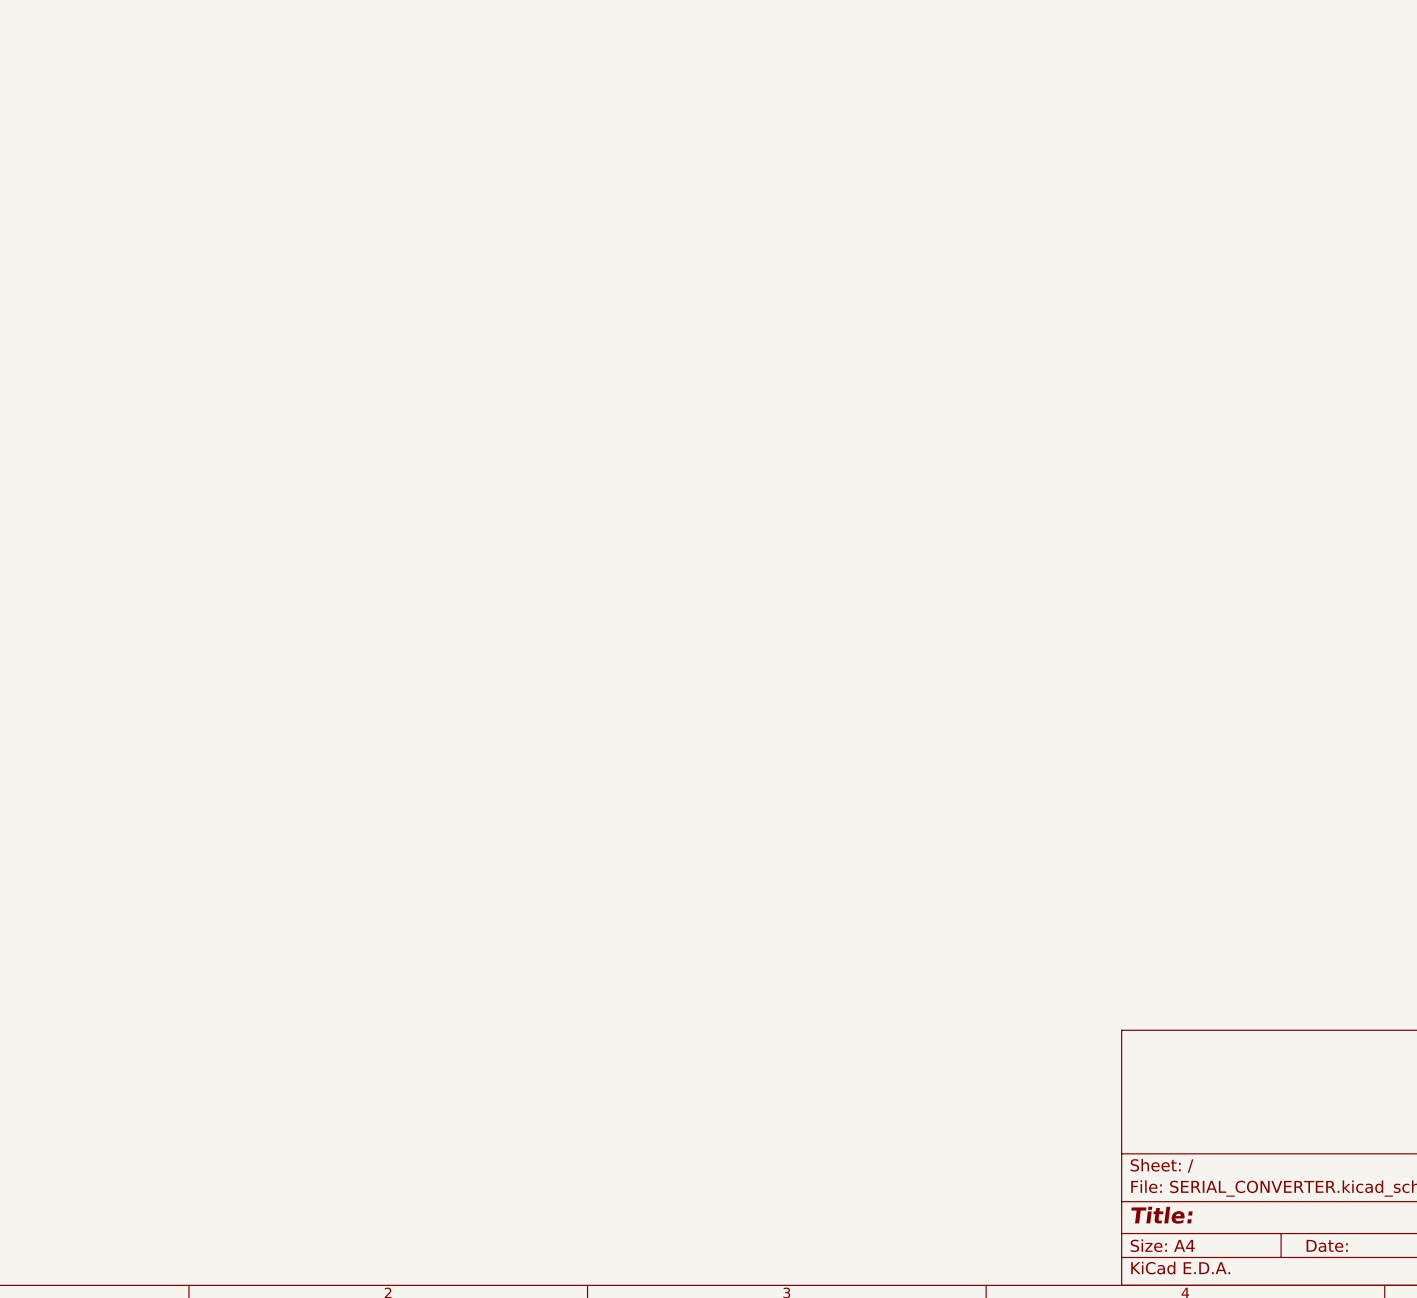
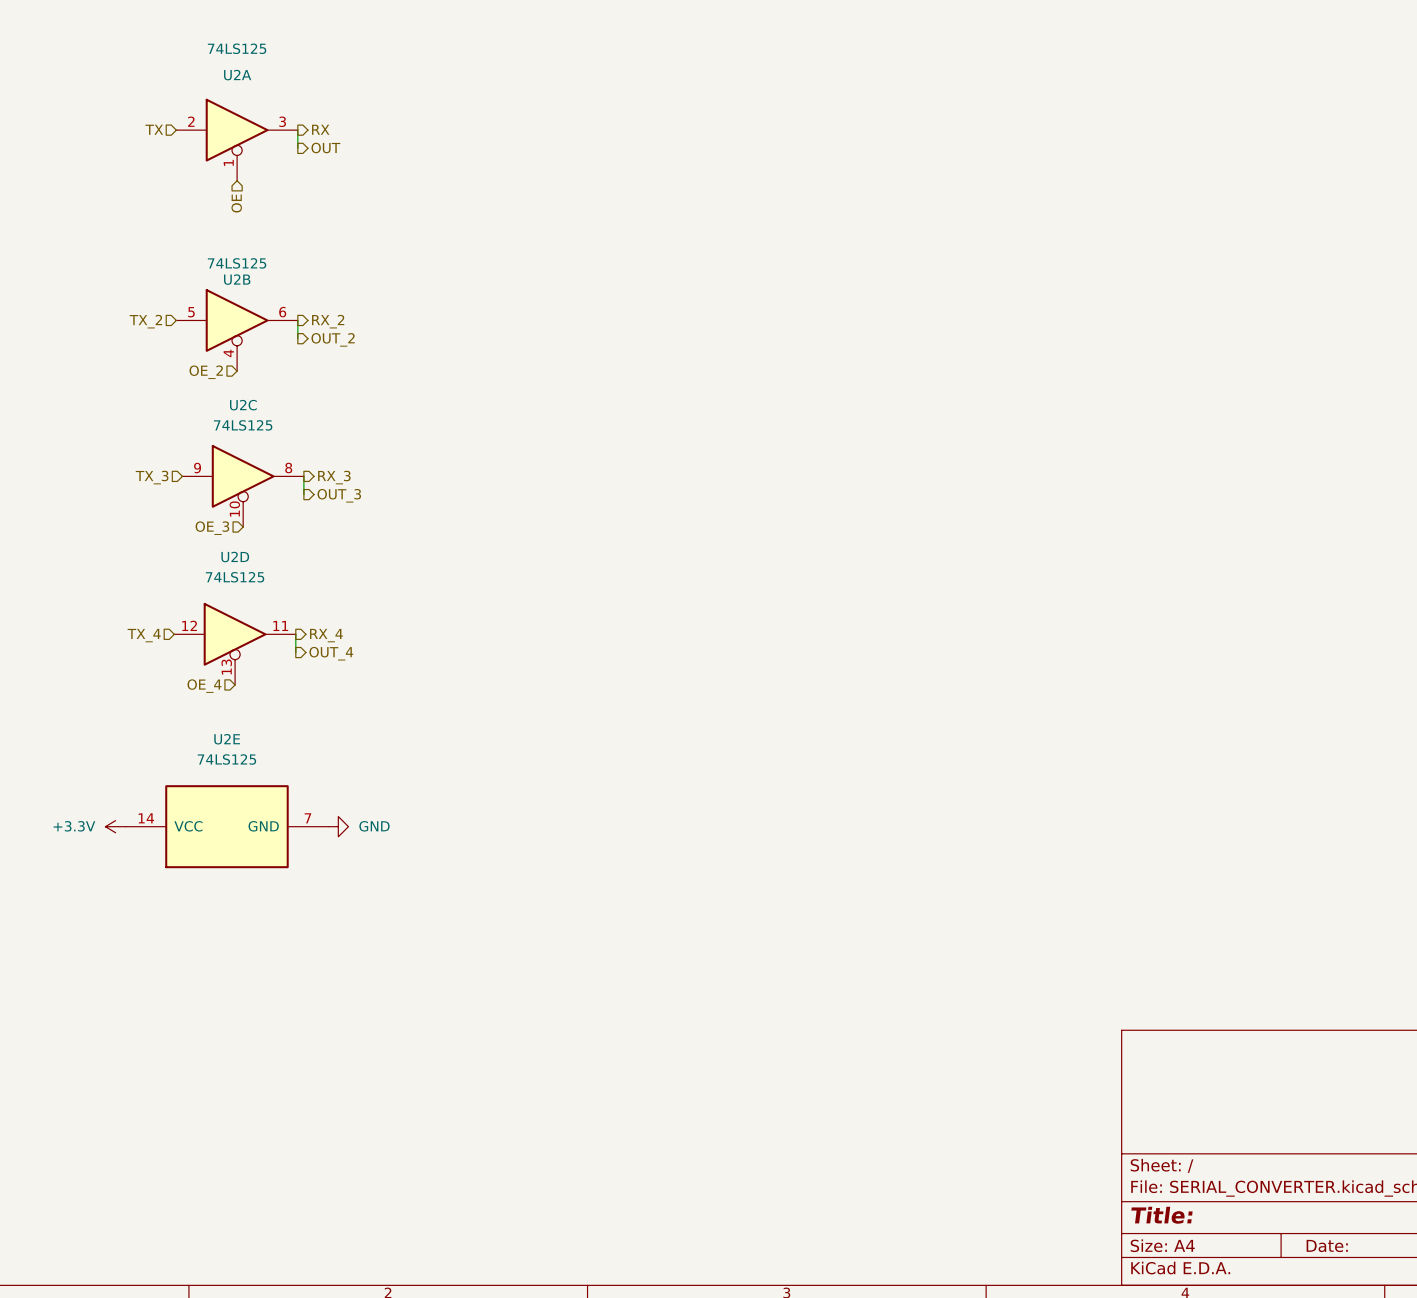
hierarchical label: none -> TX (154, 129)
hierarchical label: none -> RX (320, 129)
wire: none -> (297, 130) (297, 148)
U2A: none -> 74LS125 (237, 139)
hierarchical label: none -> OUT (325, 147)
hierarchical label: none -> OE (236, 203)
wire: none -> (297, 320) (297, 338)
hierarchical label: none -> TX_2 (145, 321)
hierarchical label: none -> RX_2 (328, 321)
U2B: none -> 74LS125 (237, 330)
hierarchical label: none -> OUT_2 (333, 339)
hierarchical label: none -> OE_2 (206, 372)
wire: none -> (303, 476) (303, 494)
hierarchical label: none -> TX_3 (152, 477)
hierarchical label: none -> RX_3 (334, 477)
U2C: none -> 74LS125 (243, 486)
hierarchical label: none -> OUT_3 (339, 495)
hierarchical label: none -> OE_3 (212, 528)
wire: none -> (295, 634) (295, 652)
hierarchical label: none -> TX_4 (144, 635)
hierarchical label: none -> RX_4 (326, 635)
U2D: none -> 74LS125 (235, 643)
hierarchical label: none -> OUT_4 (331, 653)
hierarchical label: none -> OE_4 (204, 686)
power symbol: none -> +3.3V (115, 826)
U2E: none -> 74LS125 (226, 826)
power symbol: none -> GND (338, 826)

